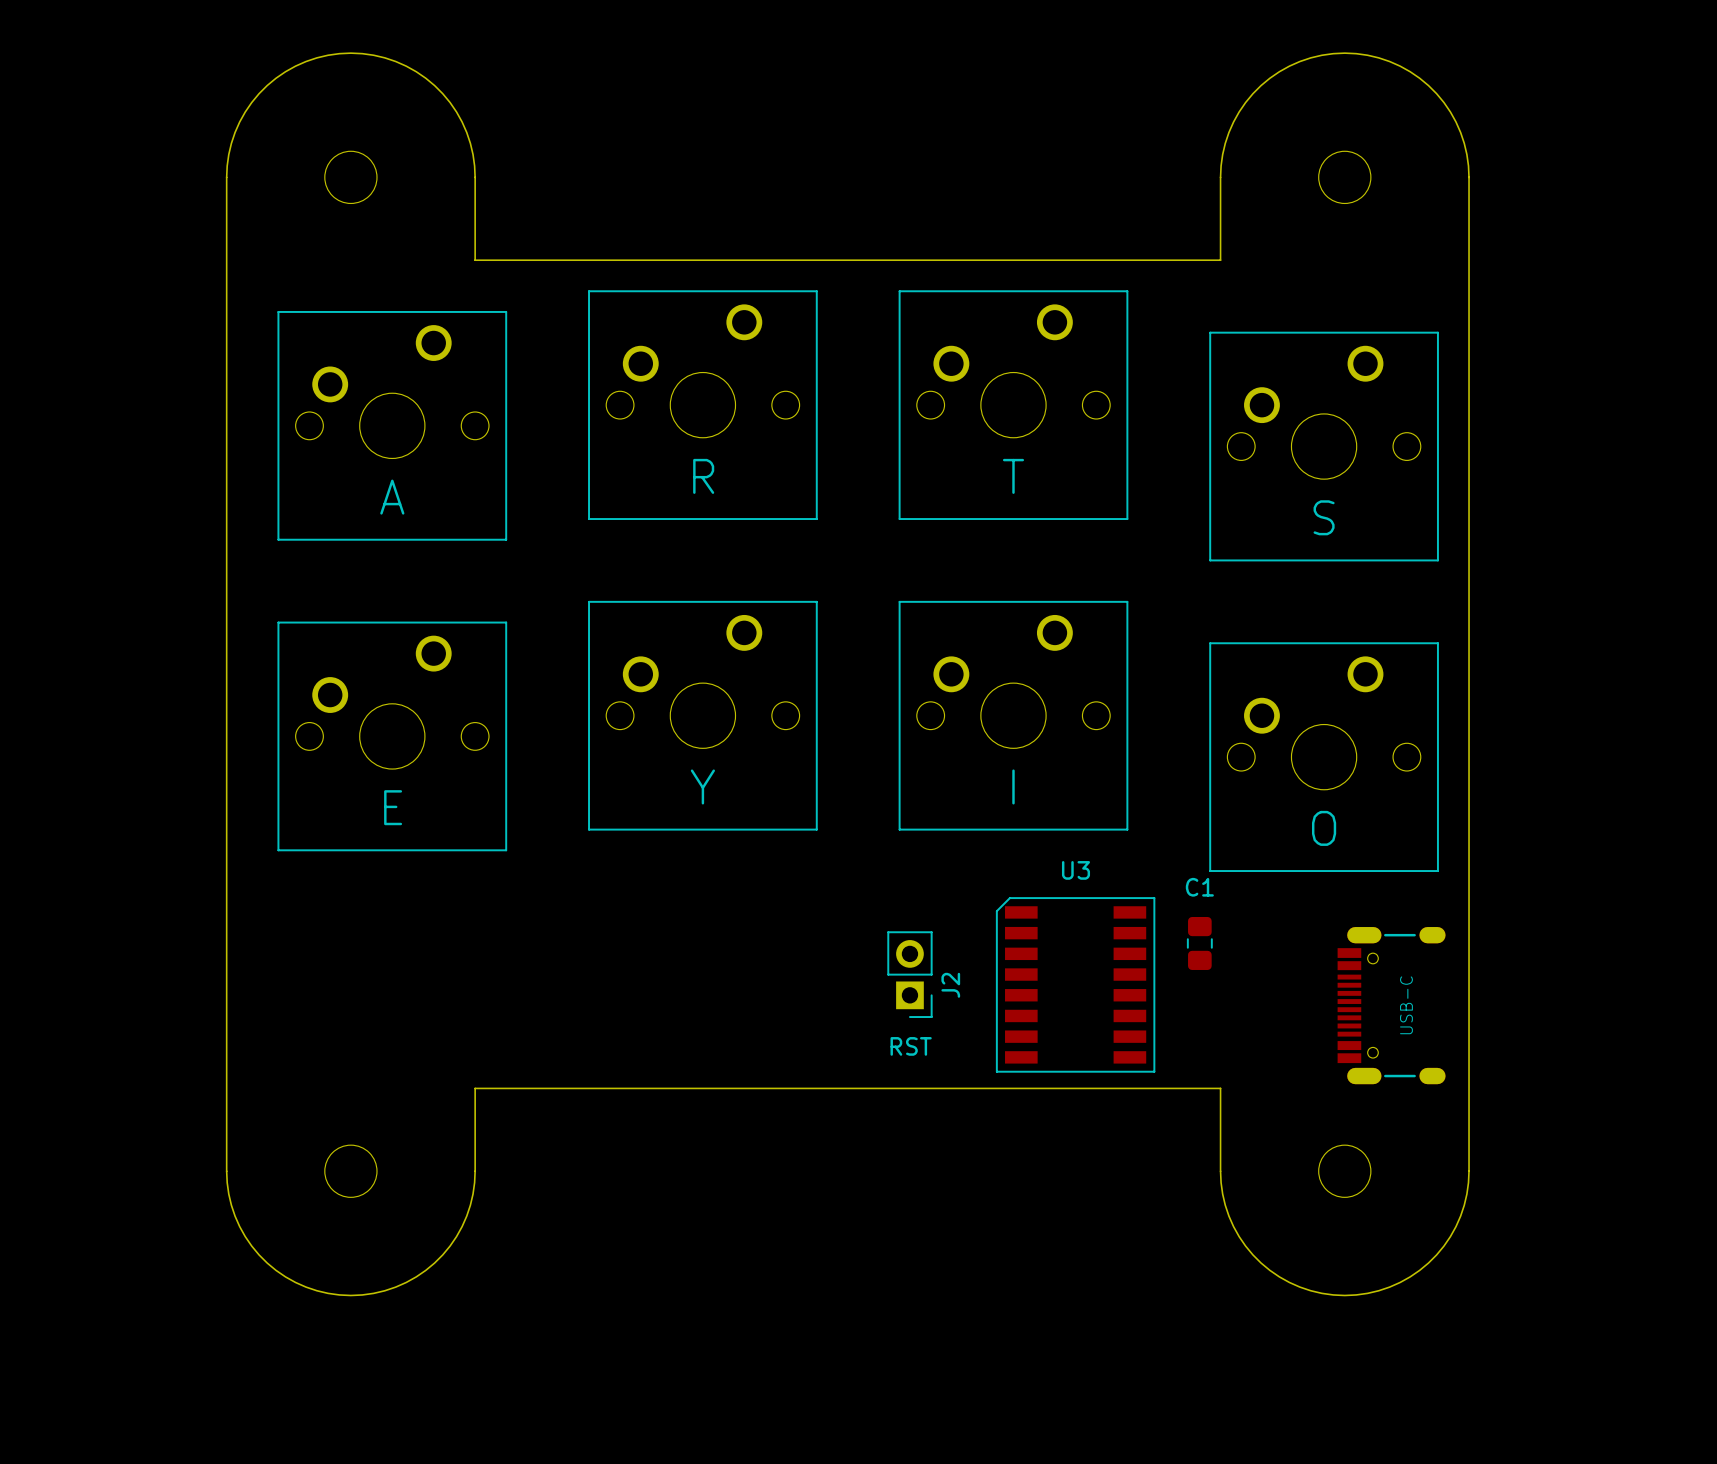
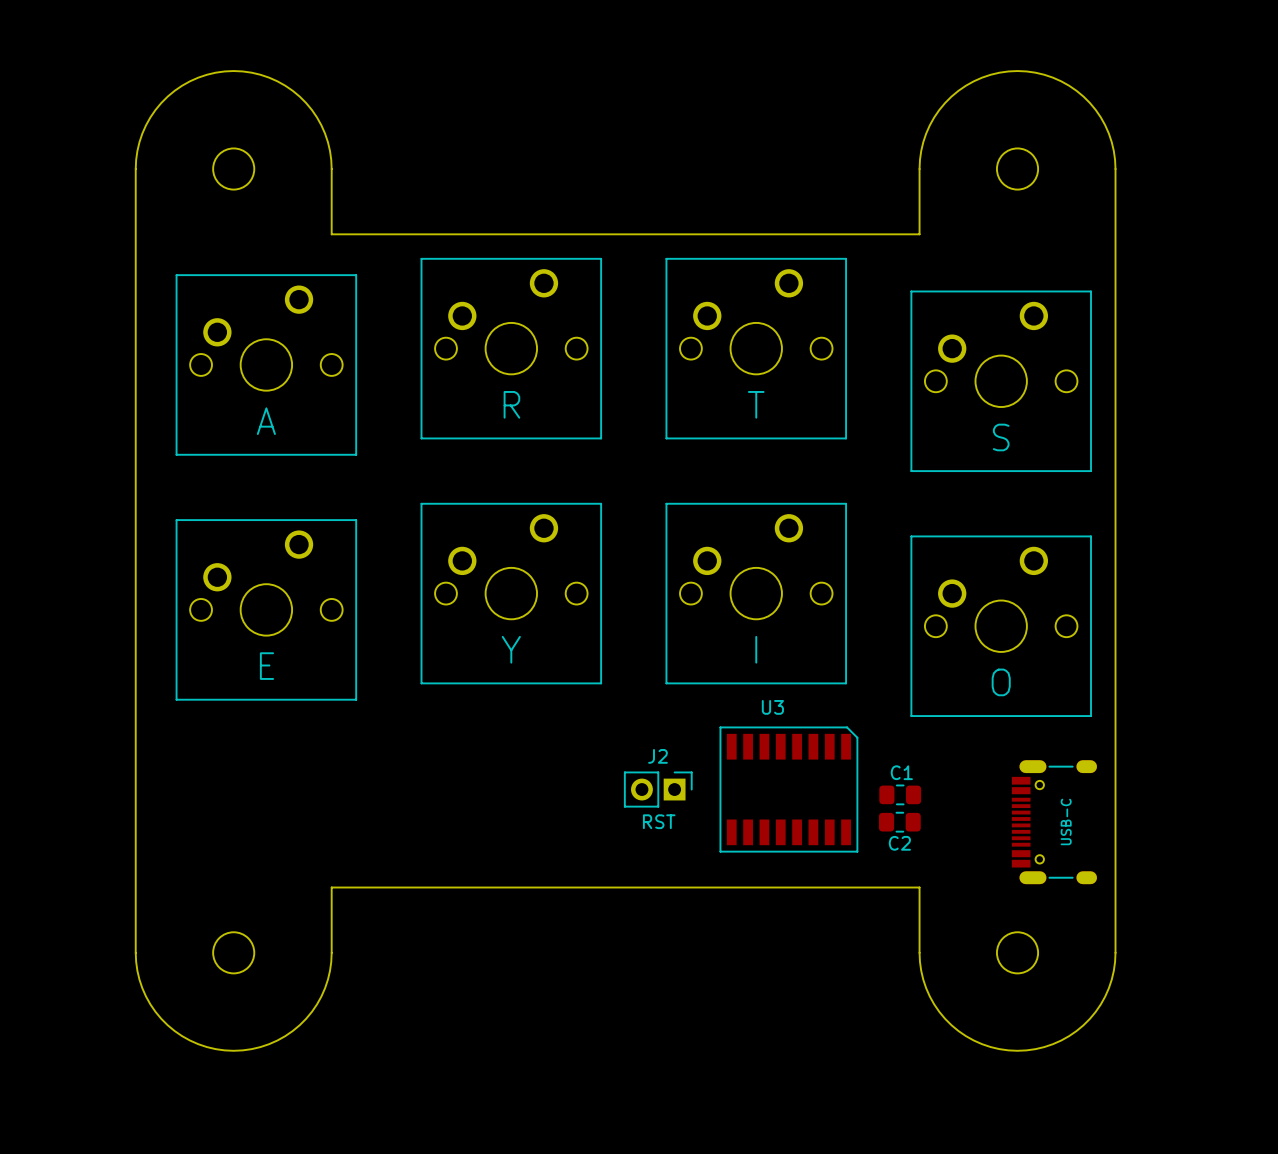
C1 rotation: 0° (1199, 943) -> 90° clockwise (900, 794)
J2 rotation: 0° (909, 974) -> 90° counterclockwise (658, 789)
U3 rotation: 0° (1075, 984) -> 90° clockwise (788, 789)
C2: none -> (899, 822)
text position: RST (911, 1046) -> RST (659, 821)

